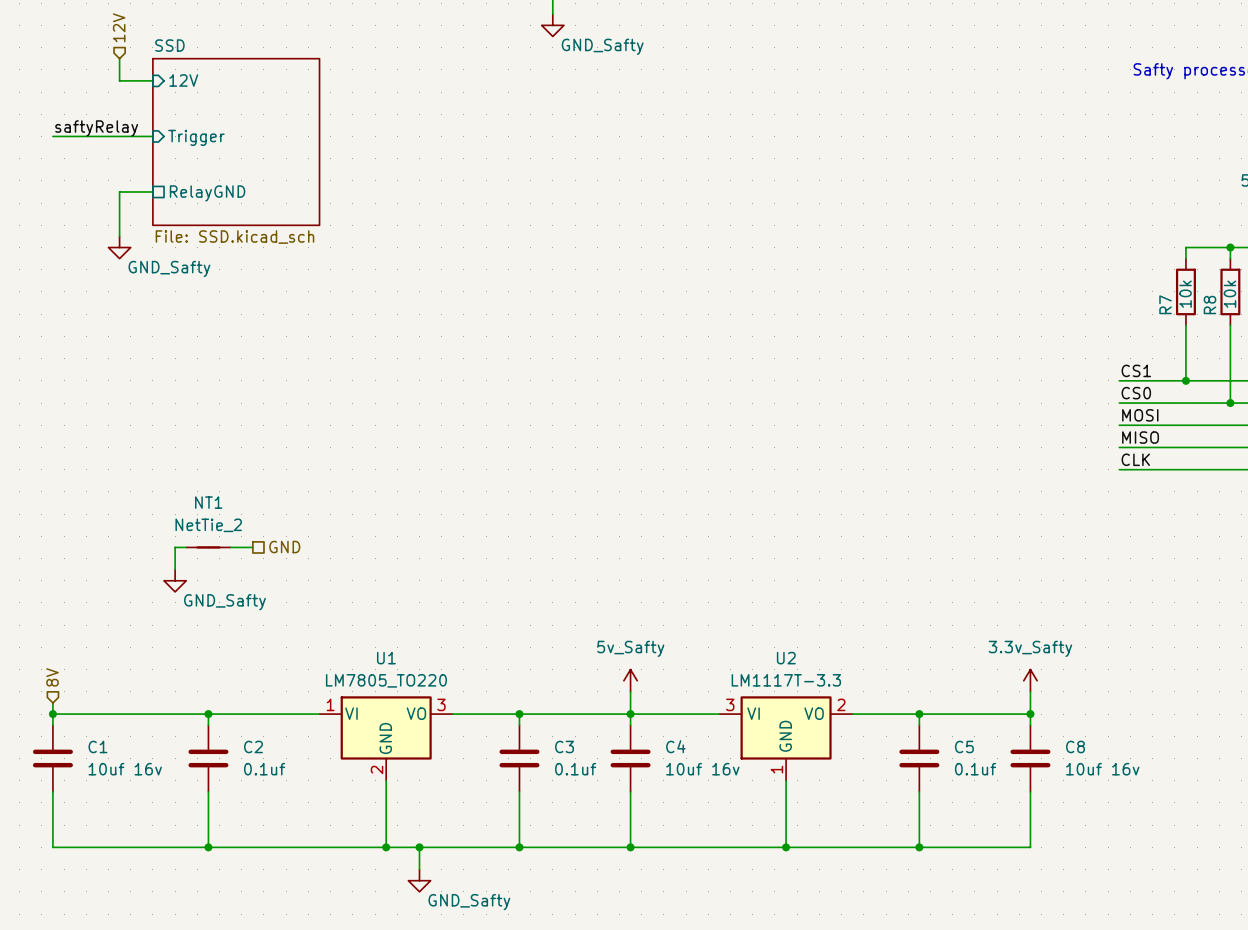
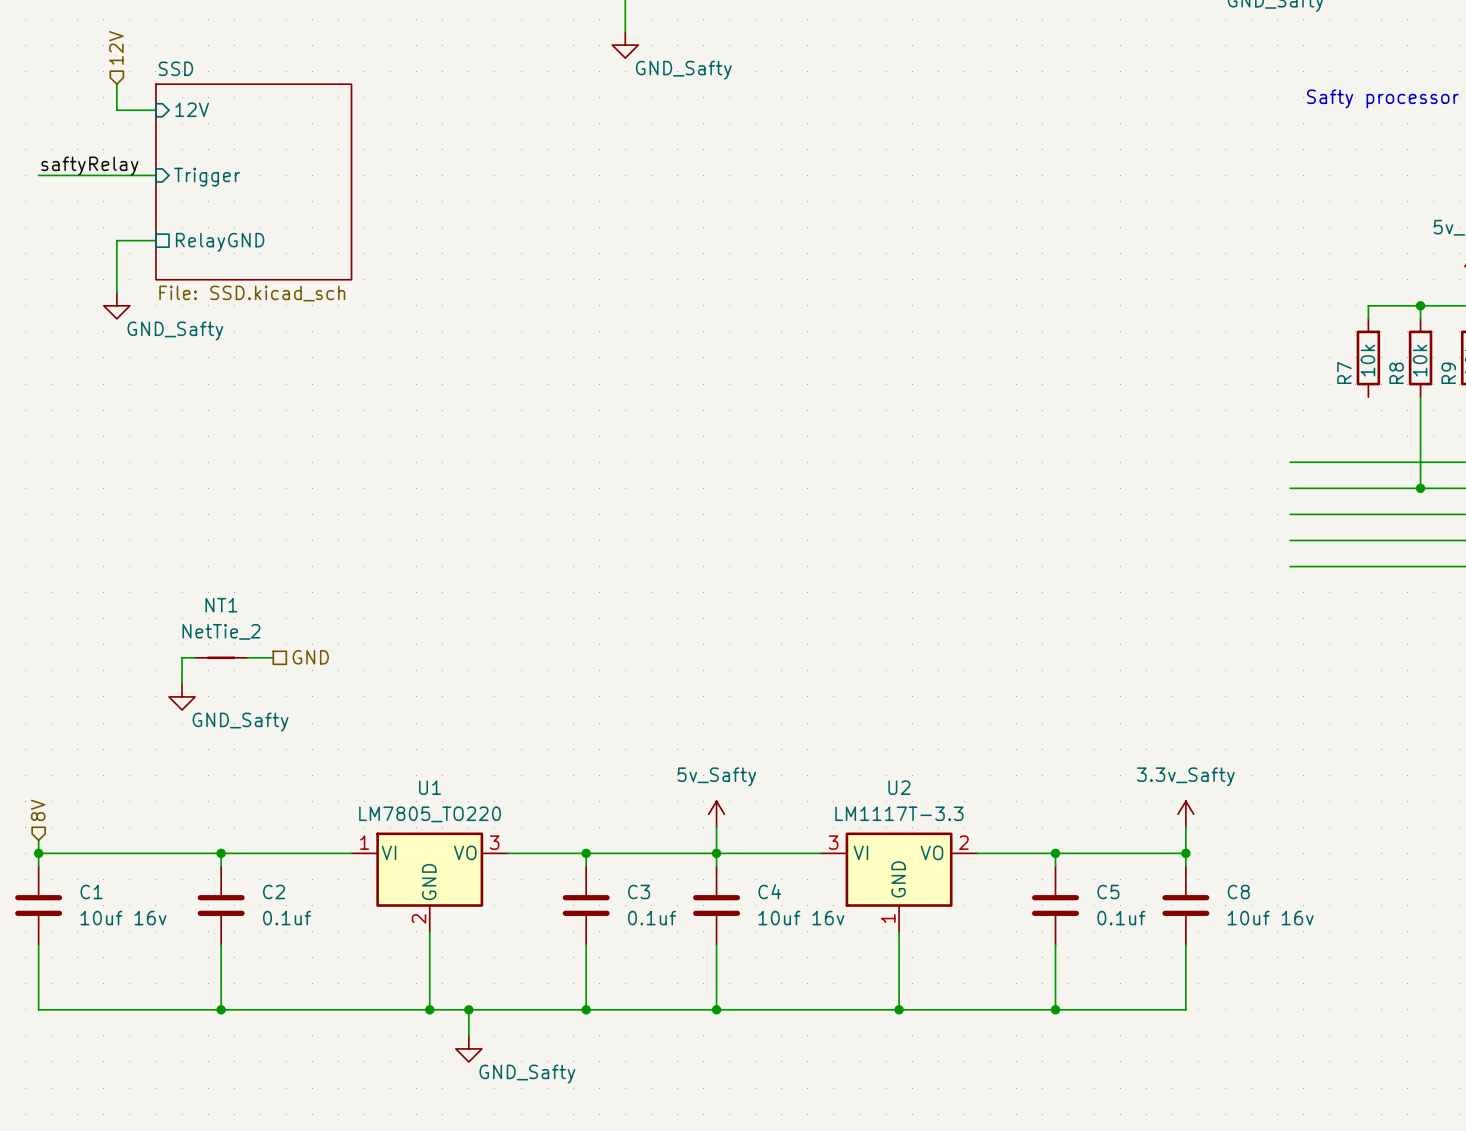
wire: (1185, 325) (1185, 380) -> none
label: CS1 (1136, 370) -> none
junction: (1185, 380) -> none
label: CS0 (1136, 393) -> none
label: MOSI (1140, 415) -> none
label: MISO (1140, 437) -> none
label: CLK (1135, 459) -> none

